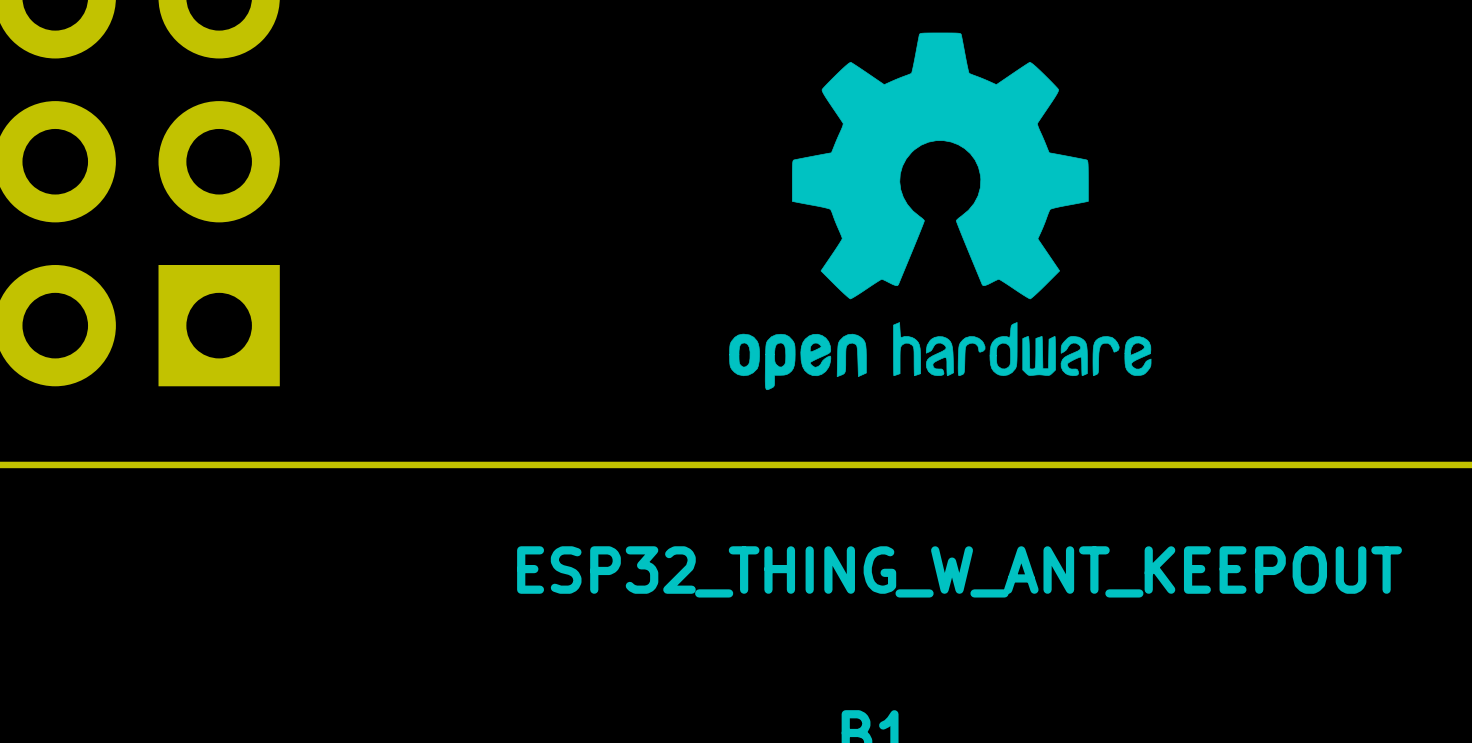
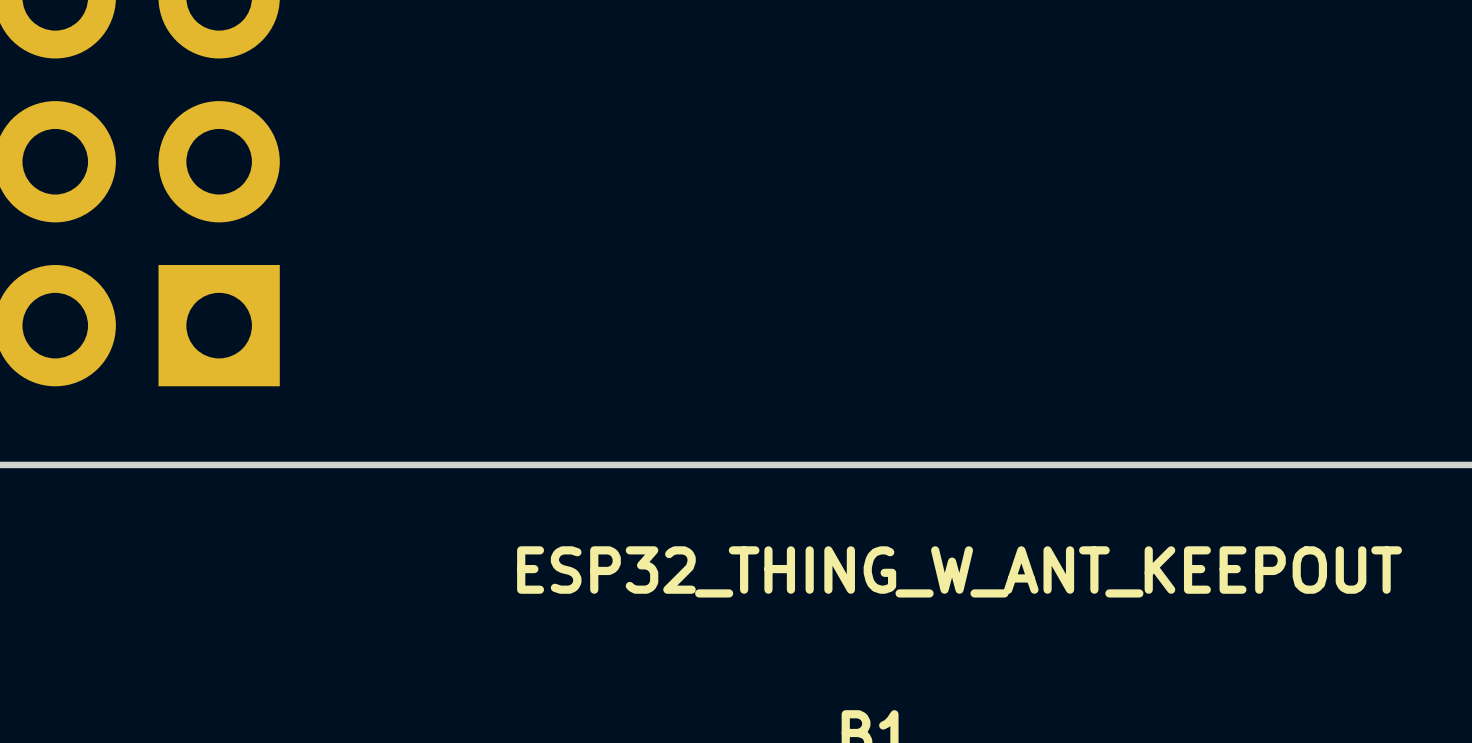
drawing: [729, 32, 1152, 391] -> none

